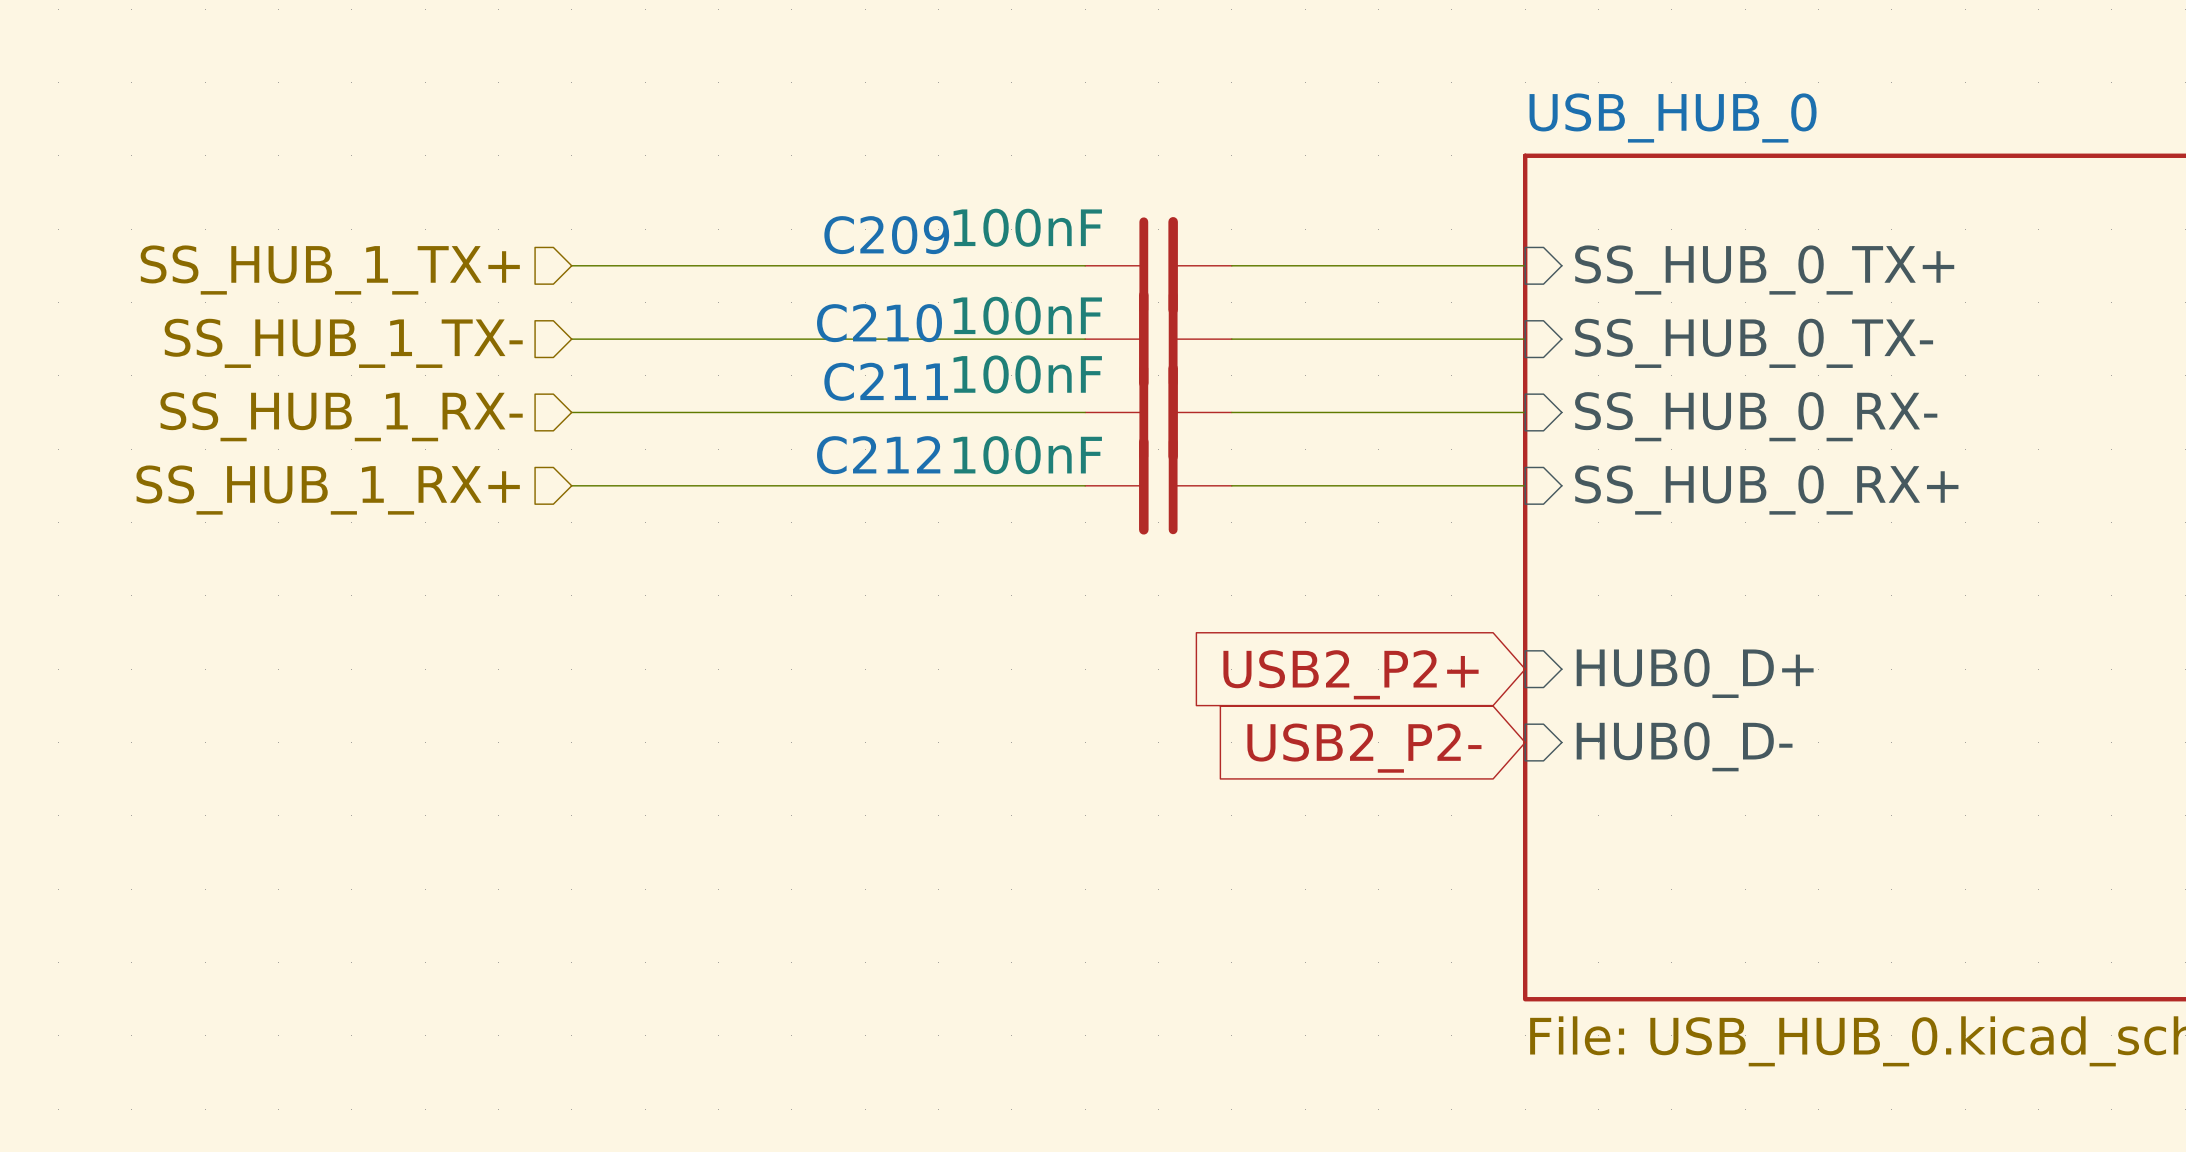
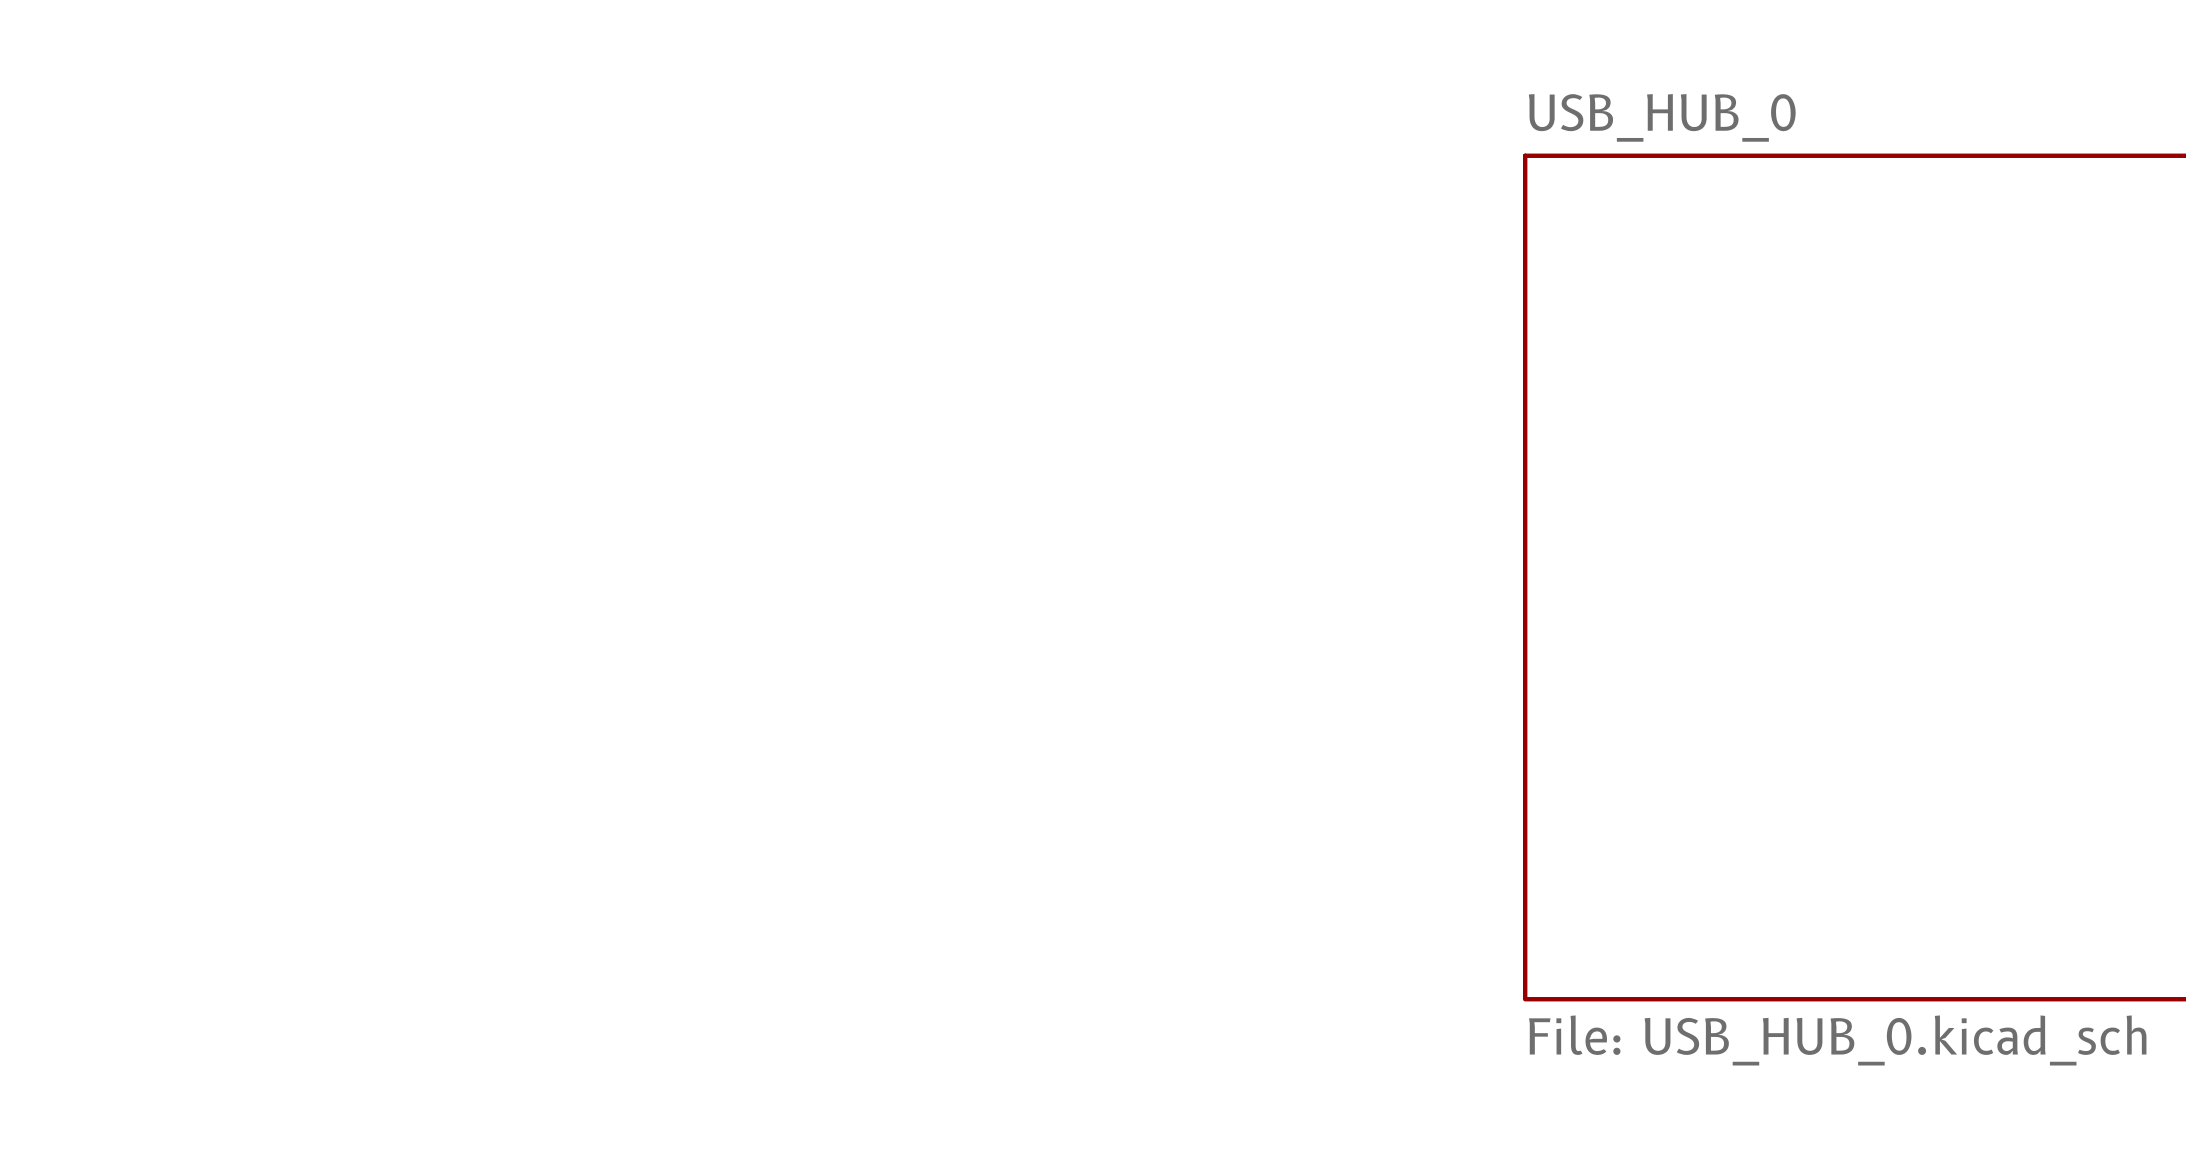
wire: (571, 265) (1085, 265) -> none
C209: 100nF (1158, 265) -> none
wire: (1231, 265) (1525, 265) -> none
hierarchical label: SS_HUB_1_TX+ (330, 270) -> none
sheet pin: SS_HUB_0_TX+ (1764, 270) -> none
wire: (571, 339) (1085, 339) -> none
C210: 100nF (1158, 339) -> none
wire: (1231, 339) (1525, 339) -> none
hierarchical label: SS_HUB_1_TX- (343, 343) -> none
sheet pin: SS_HUB_0_TX- (1754, 343) -> none
wire: (571, 412) (1085, 412) -> none
C211: 100nF (1158, 412) -> none
wire: (1231, 412) (1525, 412) -> none
hierarchical label: SS_HUB_1_RX- (341, 416) -> none
sheet pin: SS_HUB_0_RX- (1756, 416) -> none
wire: (571, 485) (1085, 485) -> none
C212: 100nF (1158, 485) -> none
wire: (1231, 485) (1525, 485) -> none
hierarchical label: SS_HUB_1_RX+ (328, 490) -> none
sheet pin: SS_HUB_0_RX+ (1766, 490) -> none
sheet pin: HUB0_D+ (1695, 673) -> none
global label: USB2_P2+ (1351, 674) -> none
sheet pin: HUB0_D- (1684, 746) -> none
global label: USB2_P2- (1364, 748) -> none

